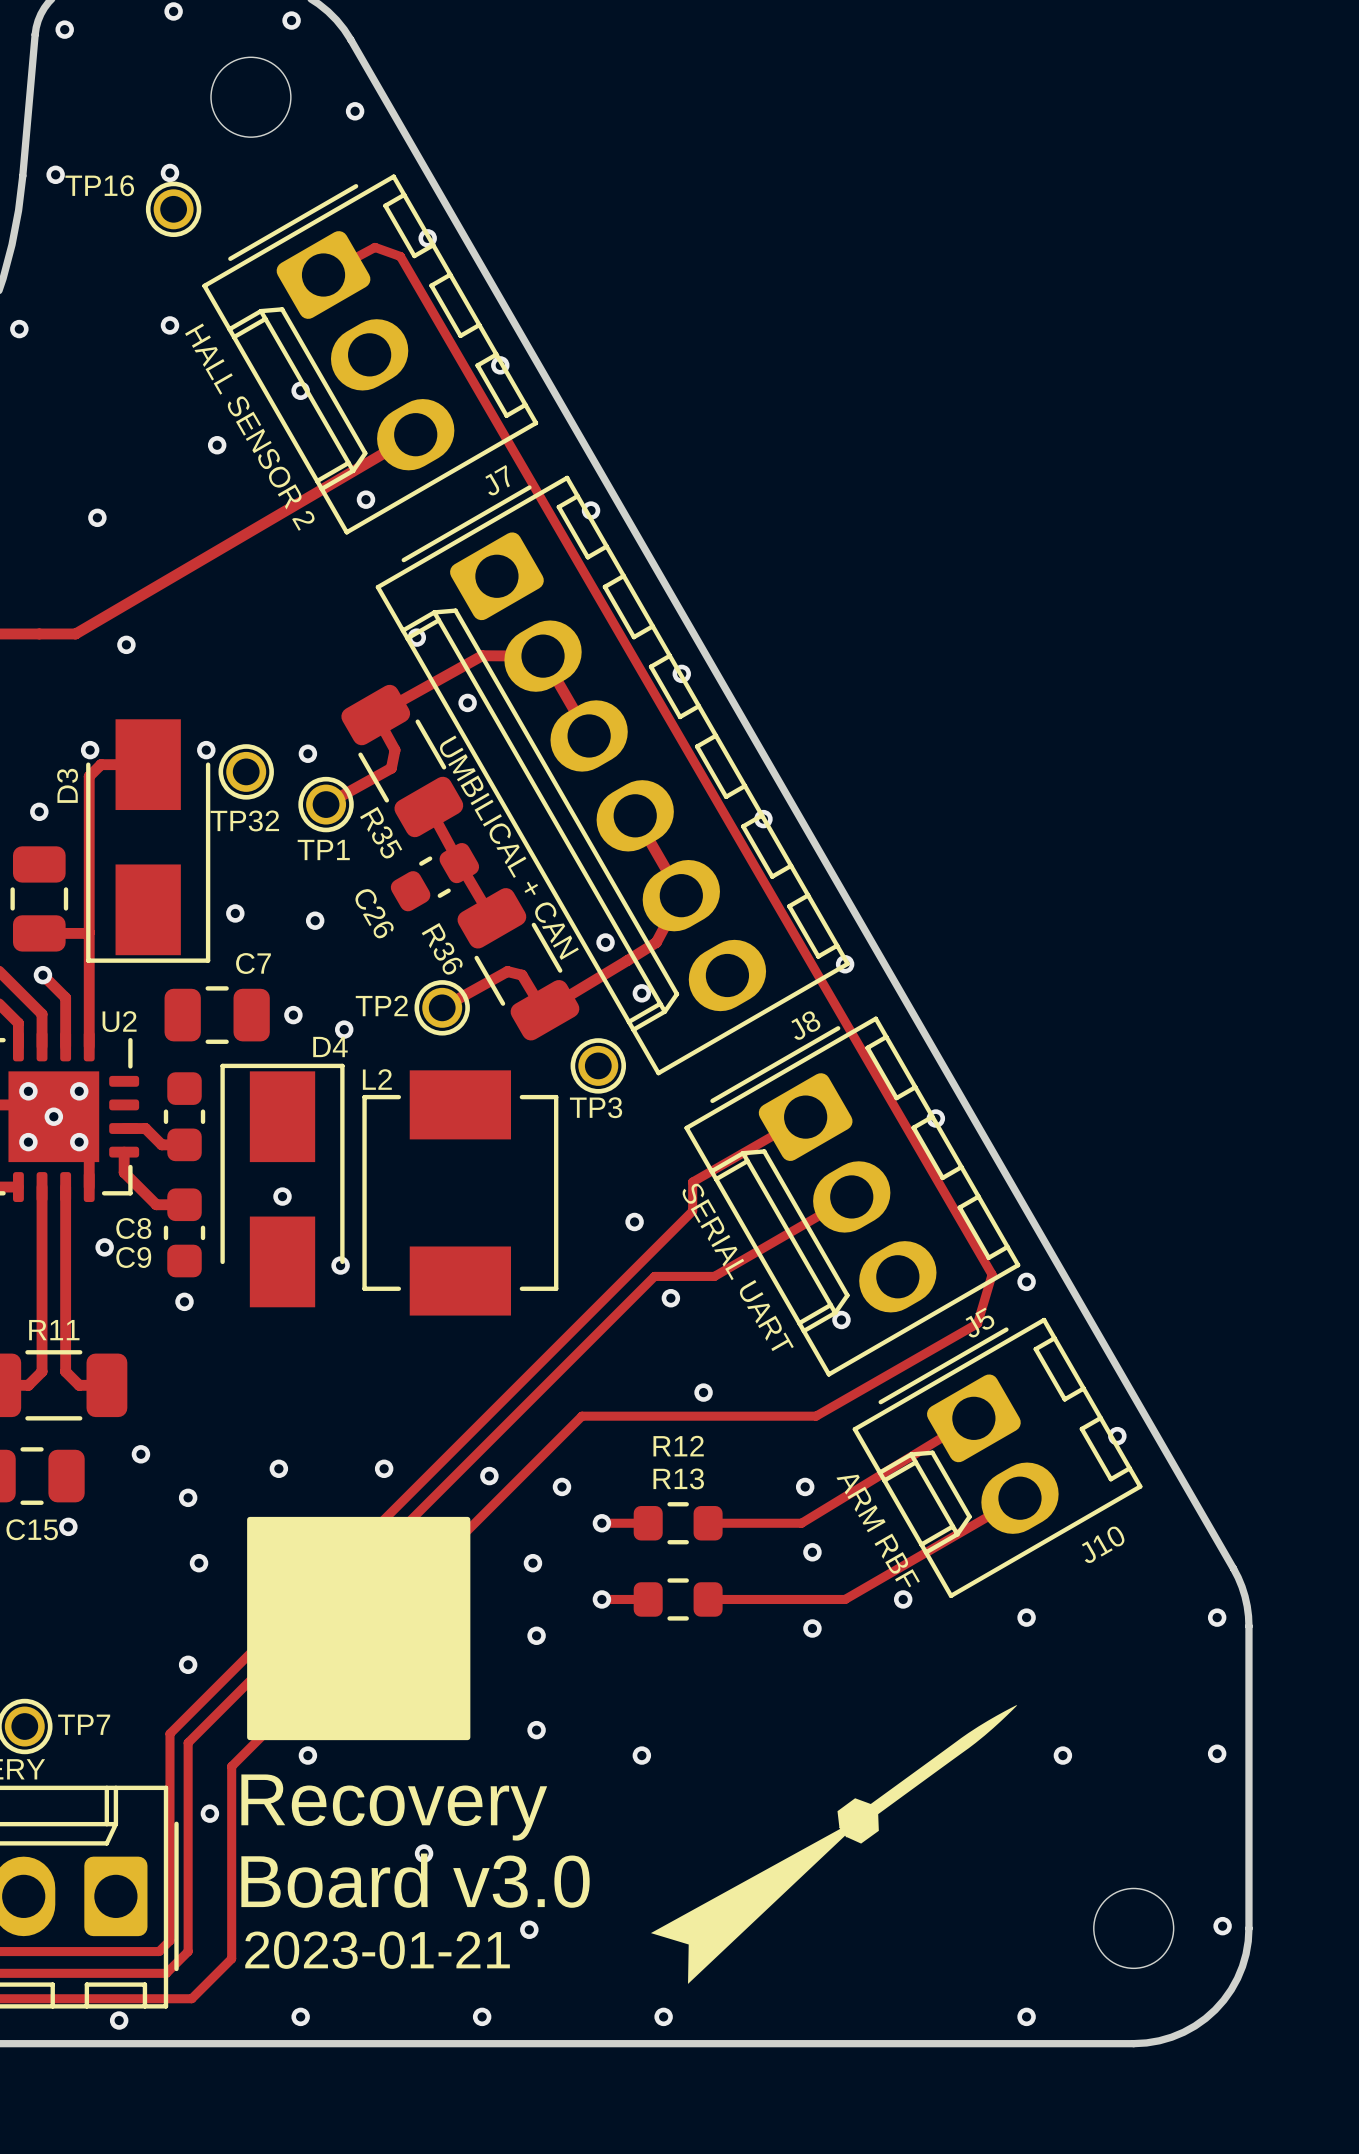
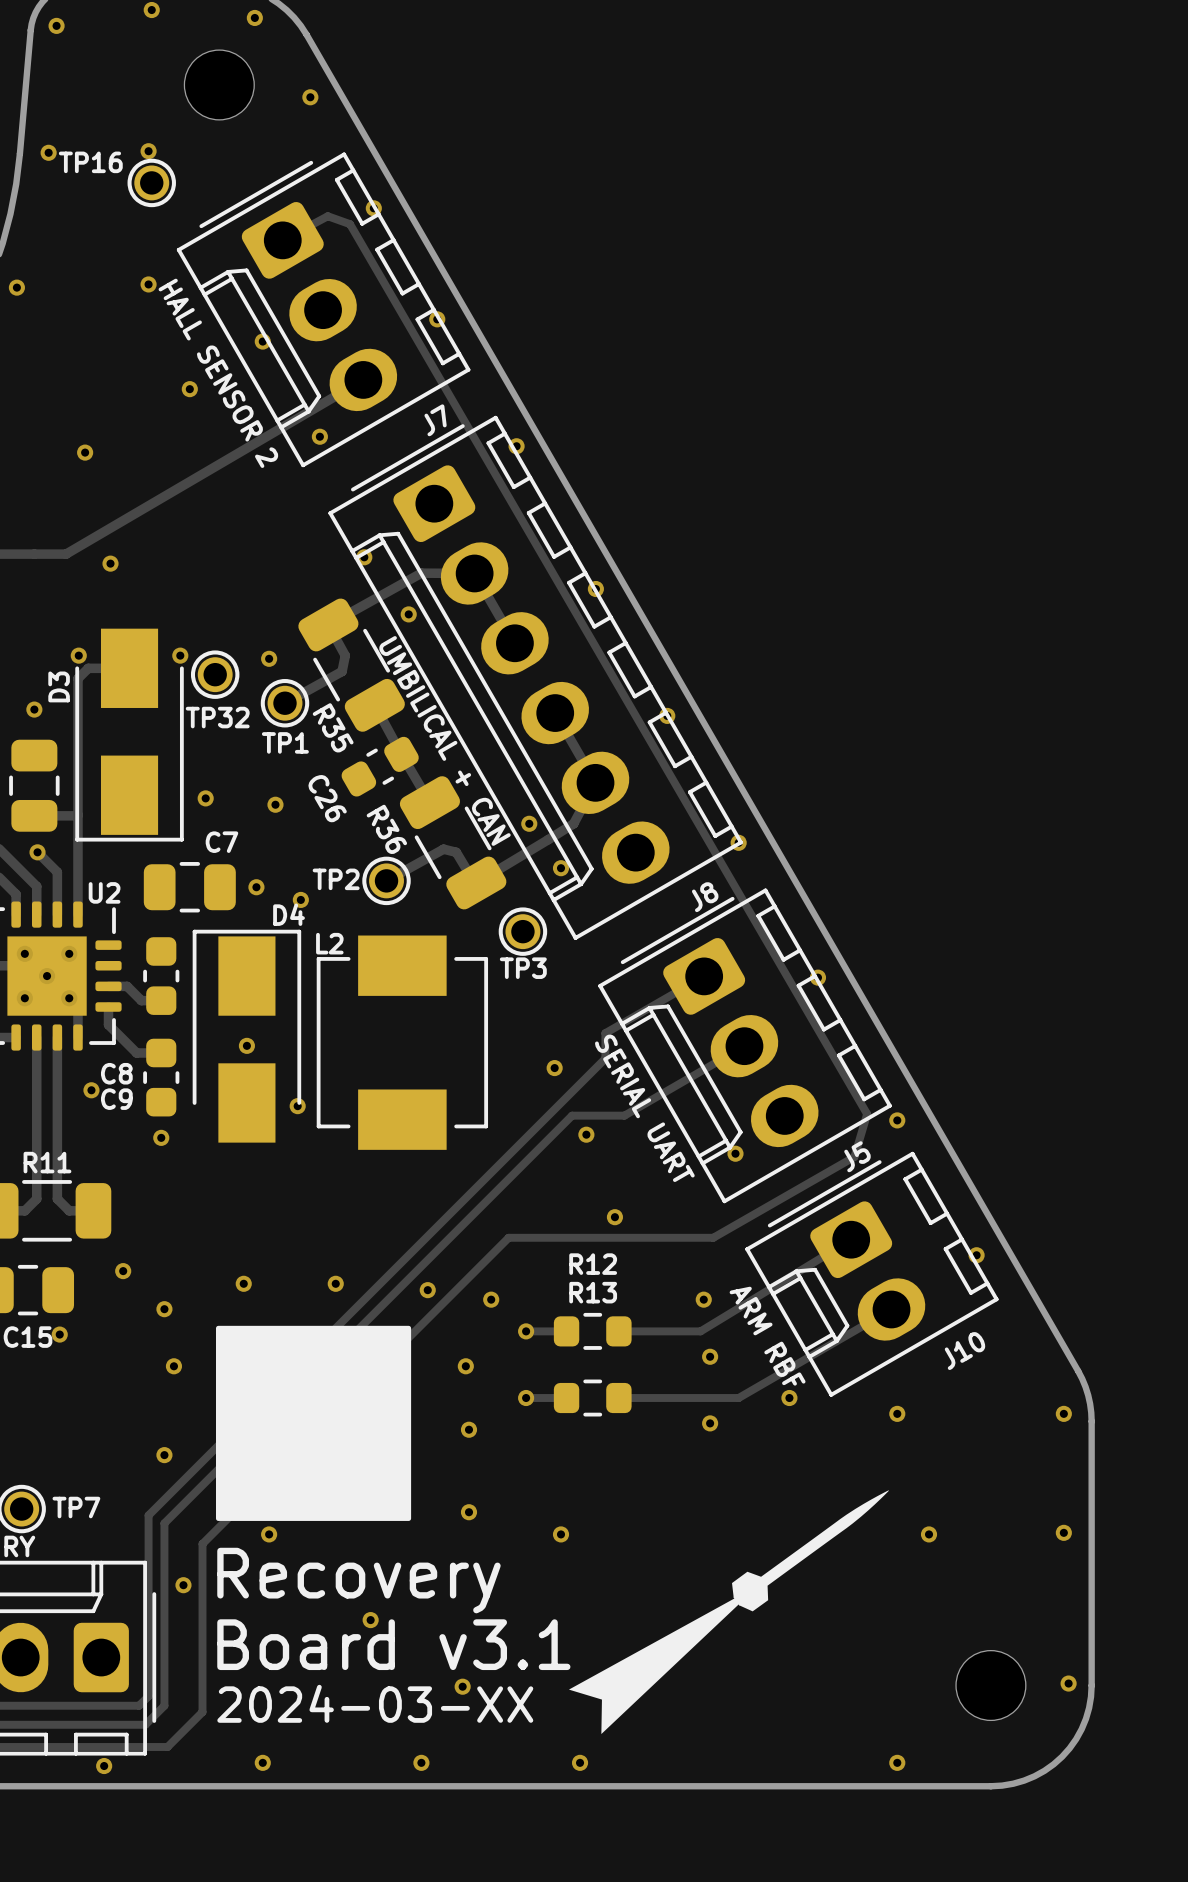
text: Board v3.0 (415, 1880) -> Board v3.1 (393, 1644)
text: 2023-01-21 (377, 1950) -> 2024-03-XX (375, 1703)

